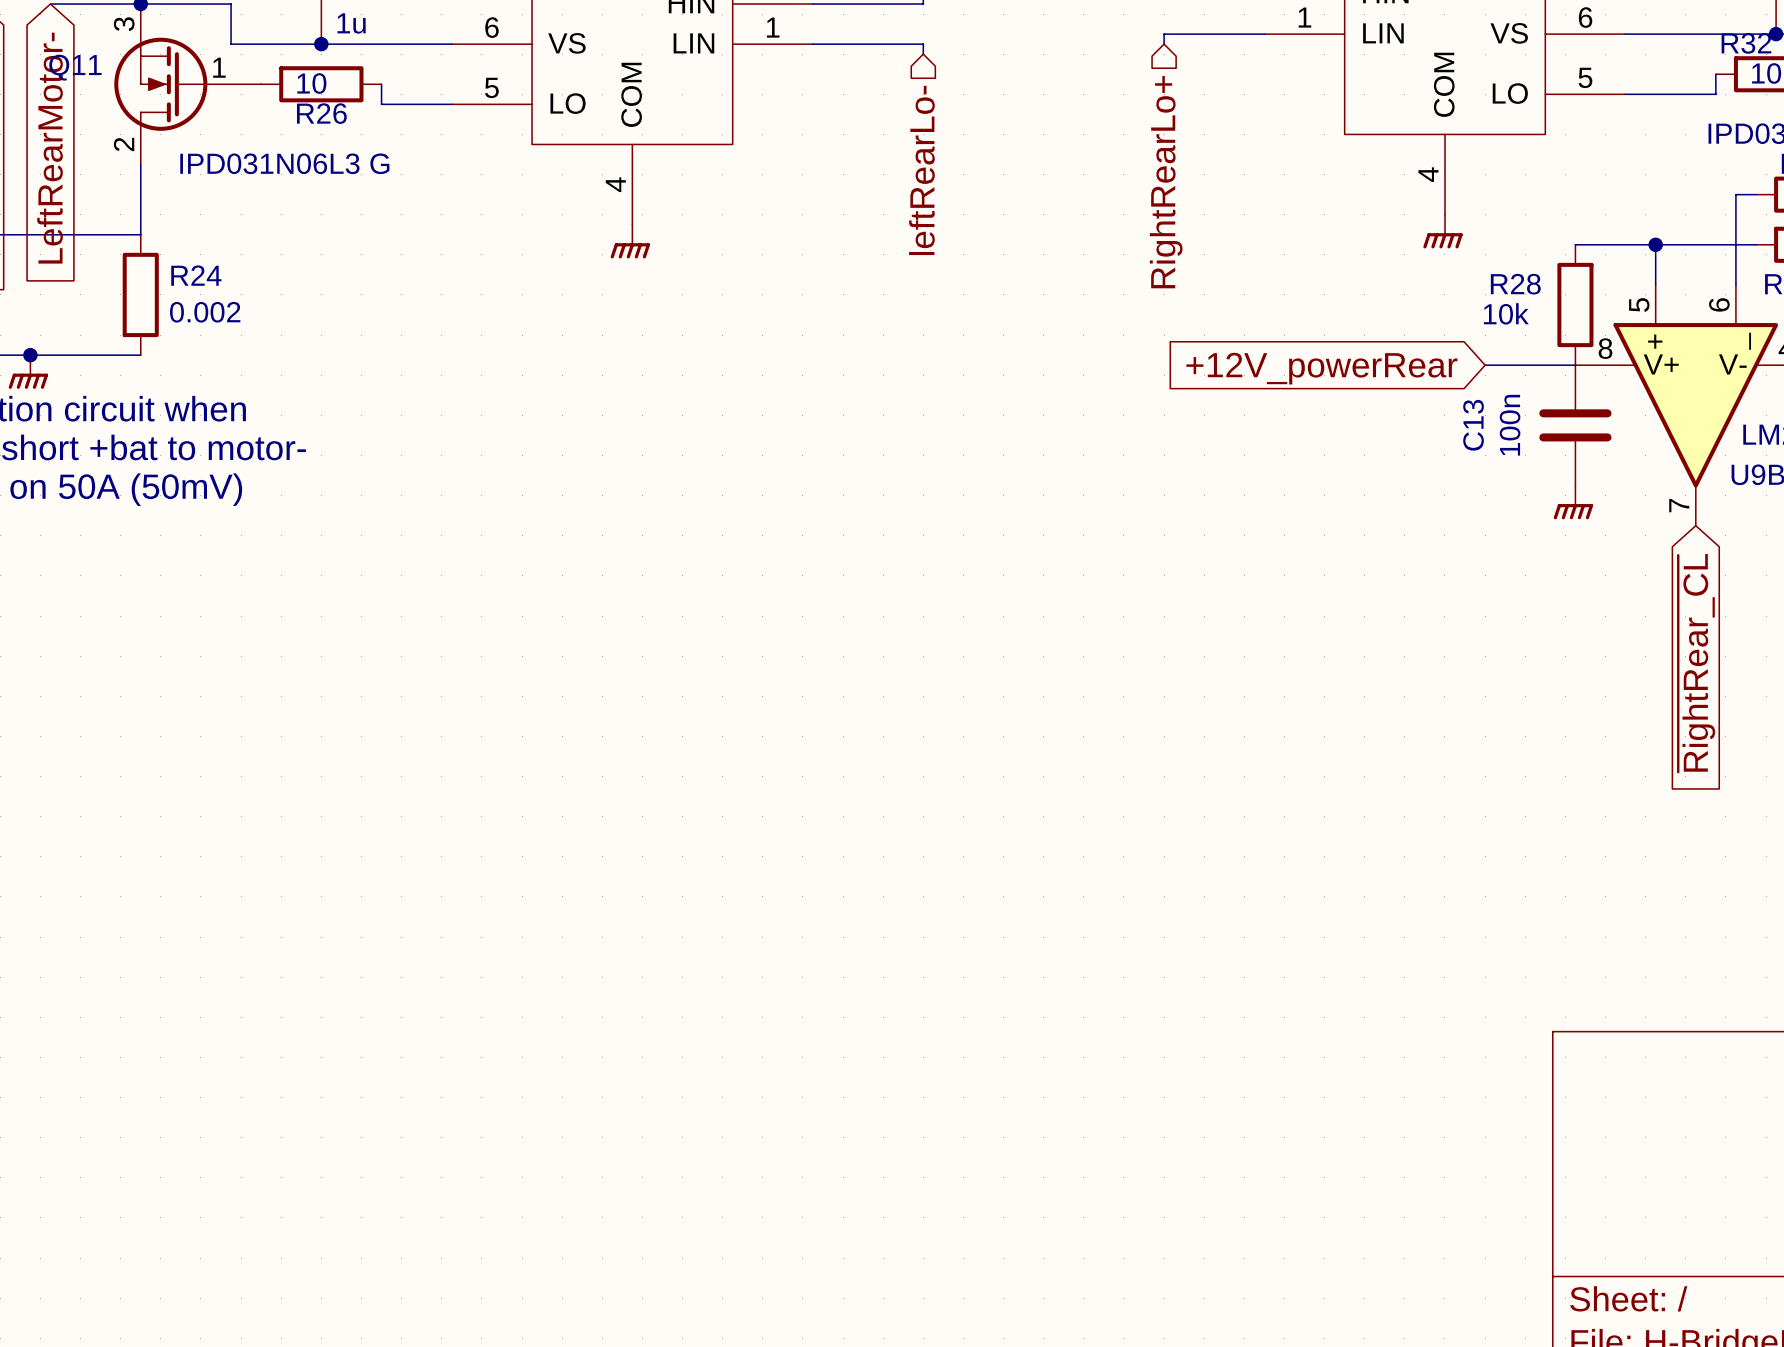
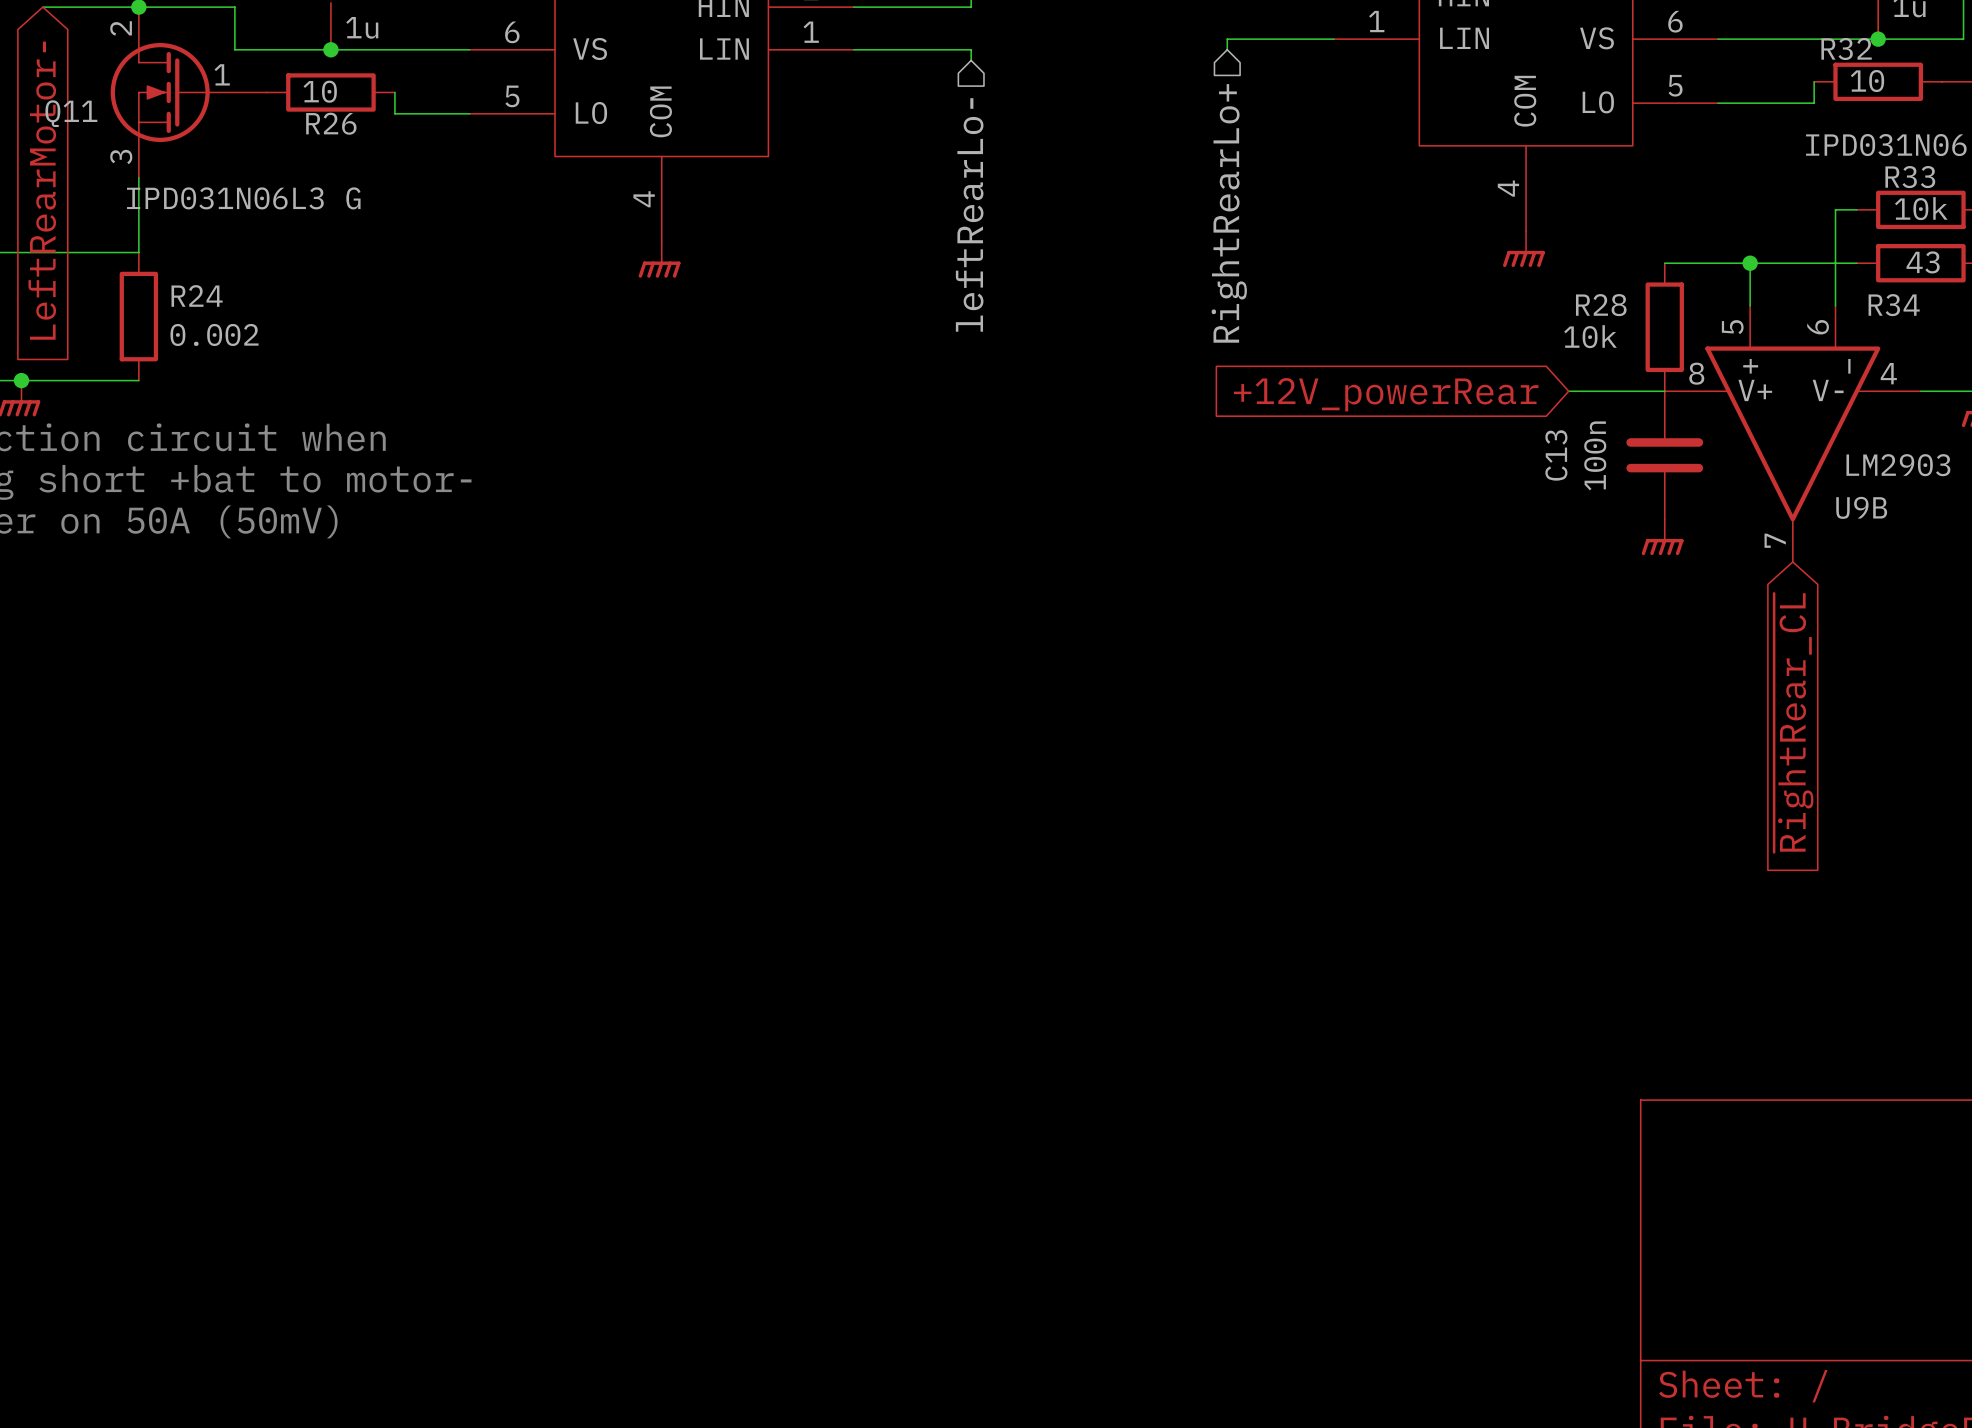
Q11 flip: as is (160, 84) -> up-down (160, 92)
Q11 value position: IPD031N06L3 G (284, 163) -> IPD031N06L3 G (243, 198)

